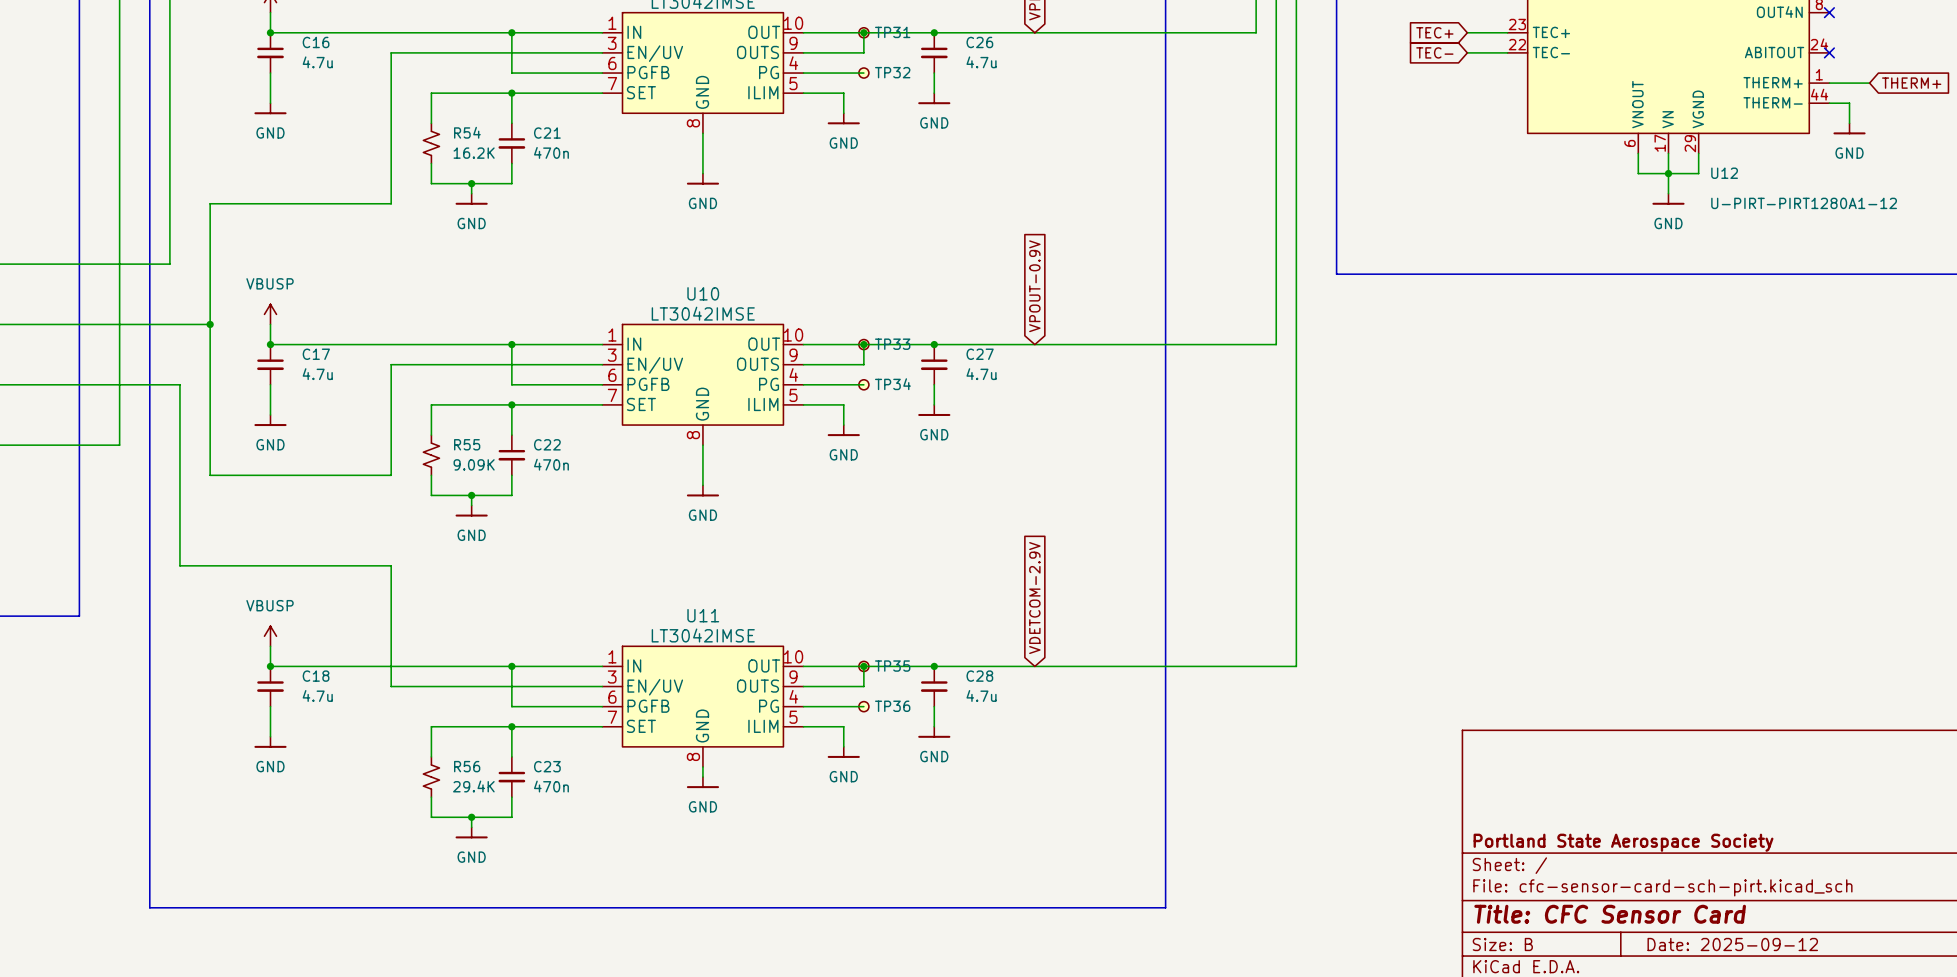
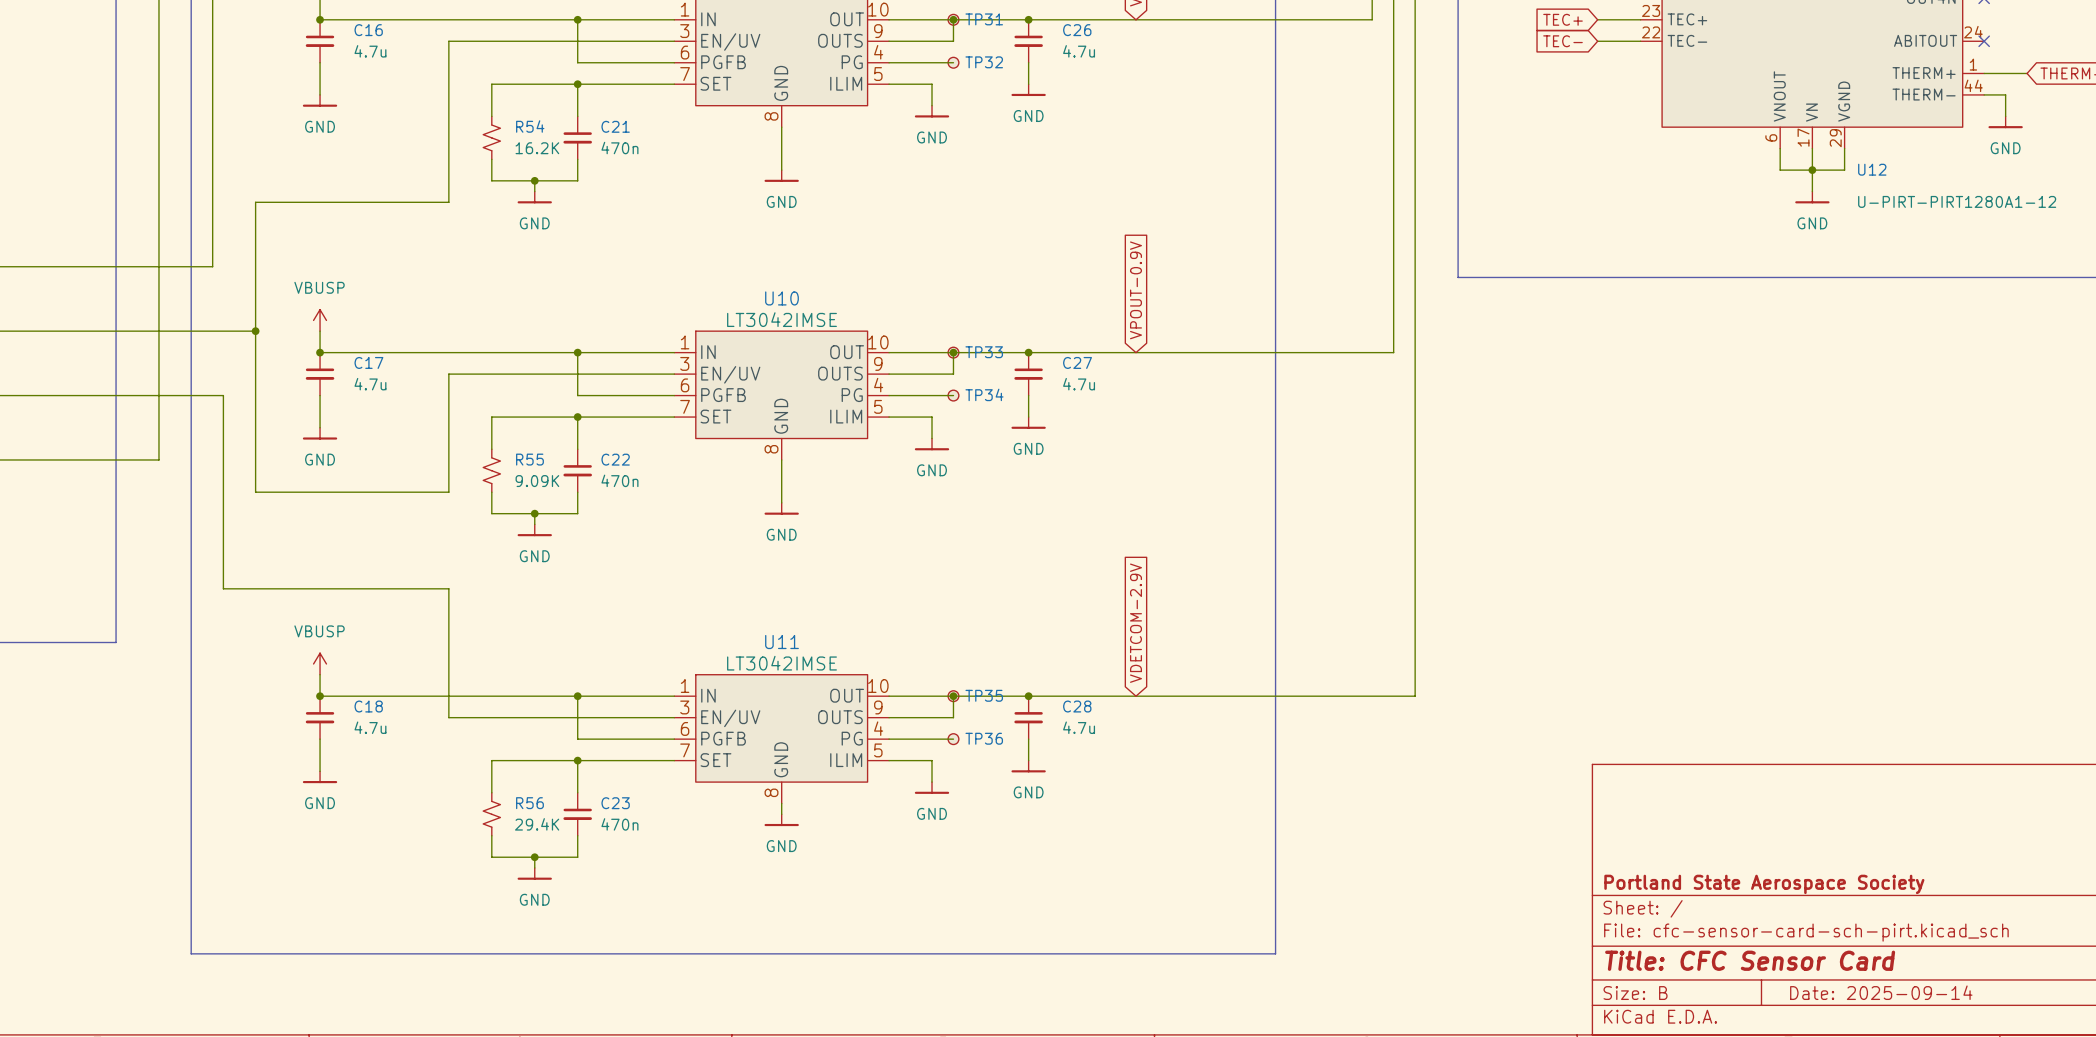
title block: Date: 2025-09-12 (1732, 944) -> Date: 2025-09-14 (1881, 992)

